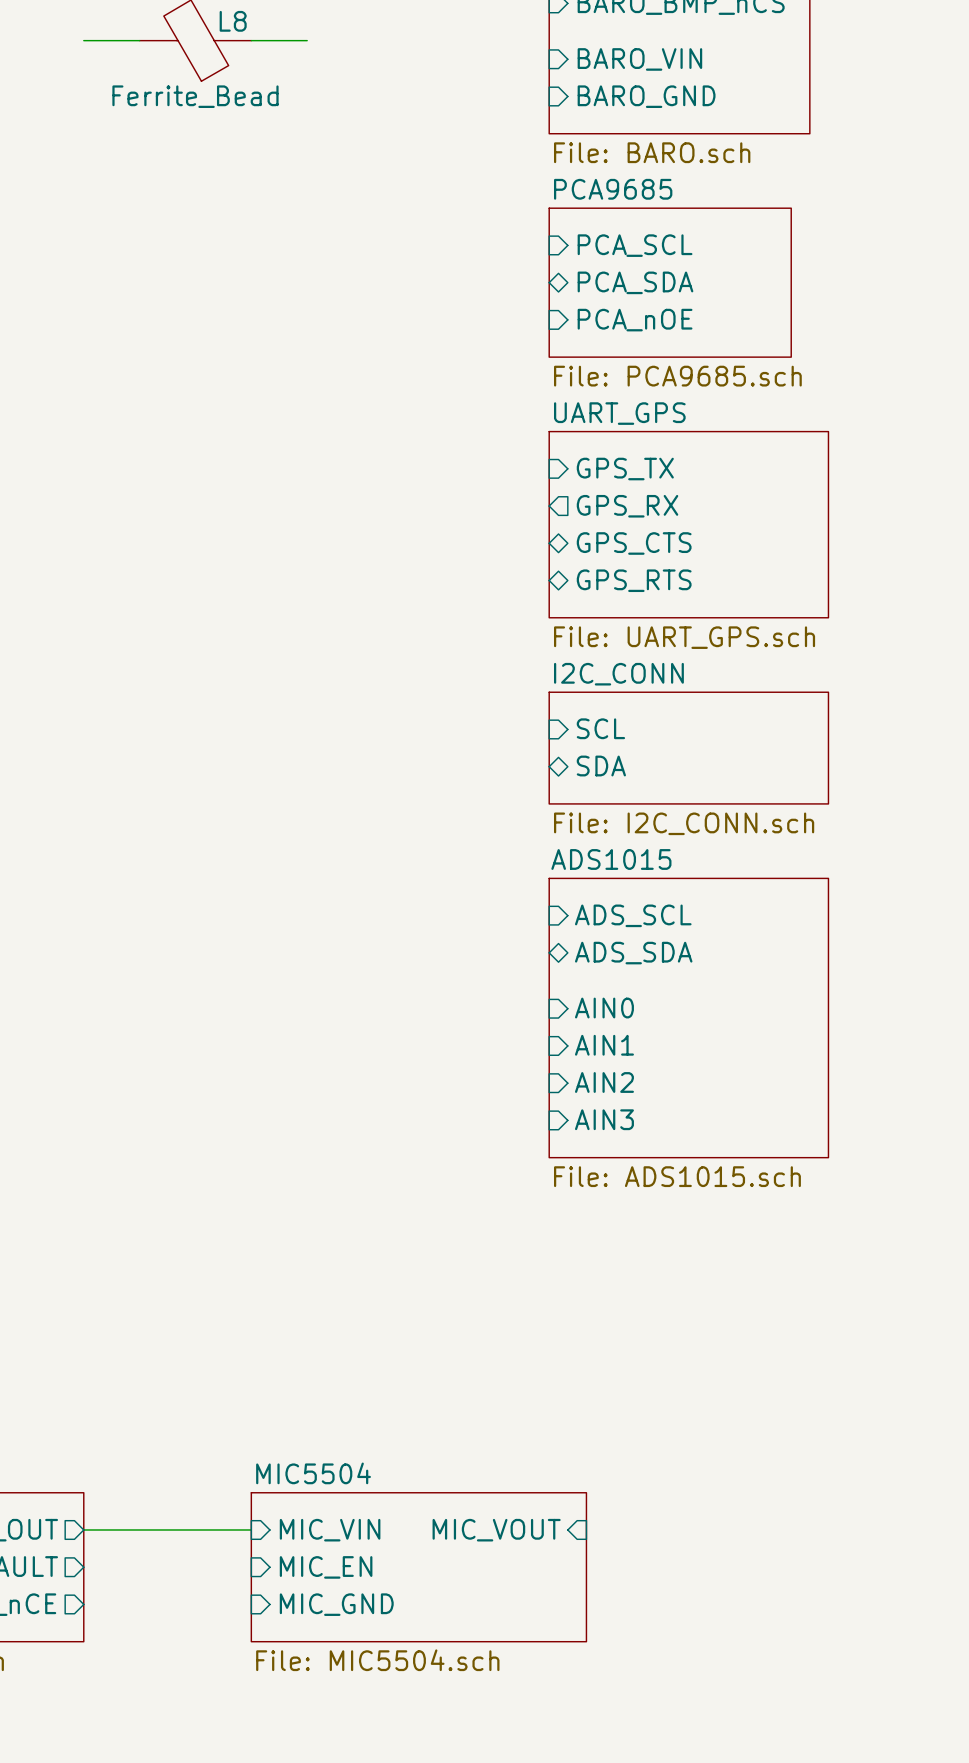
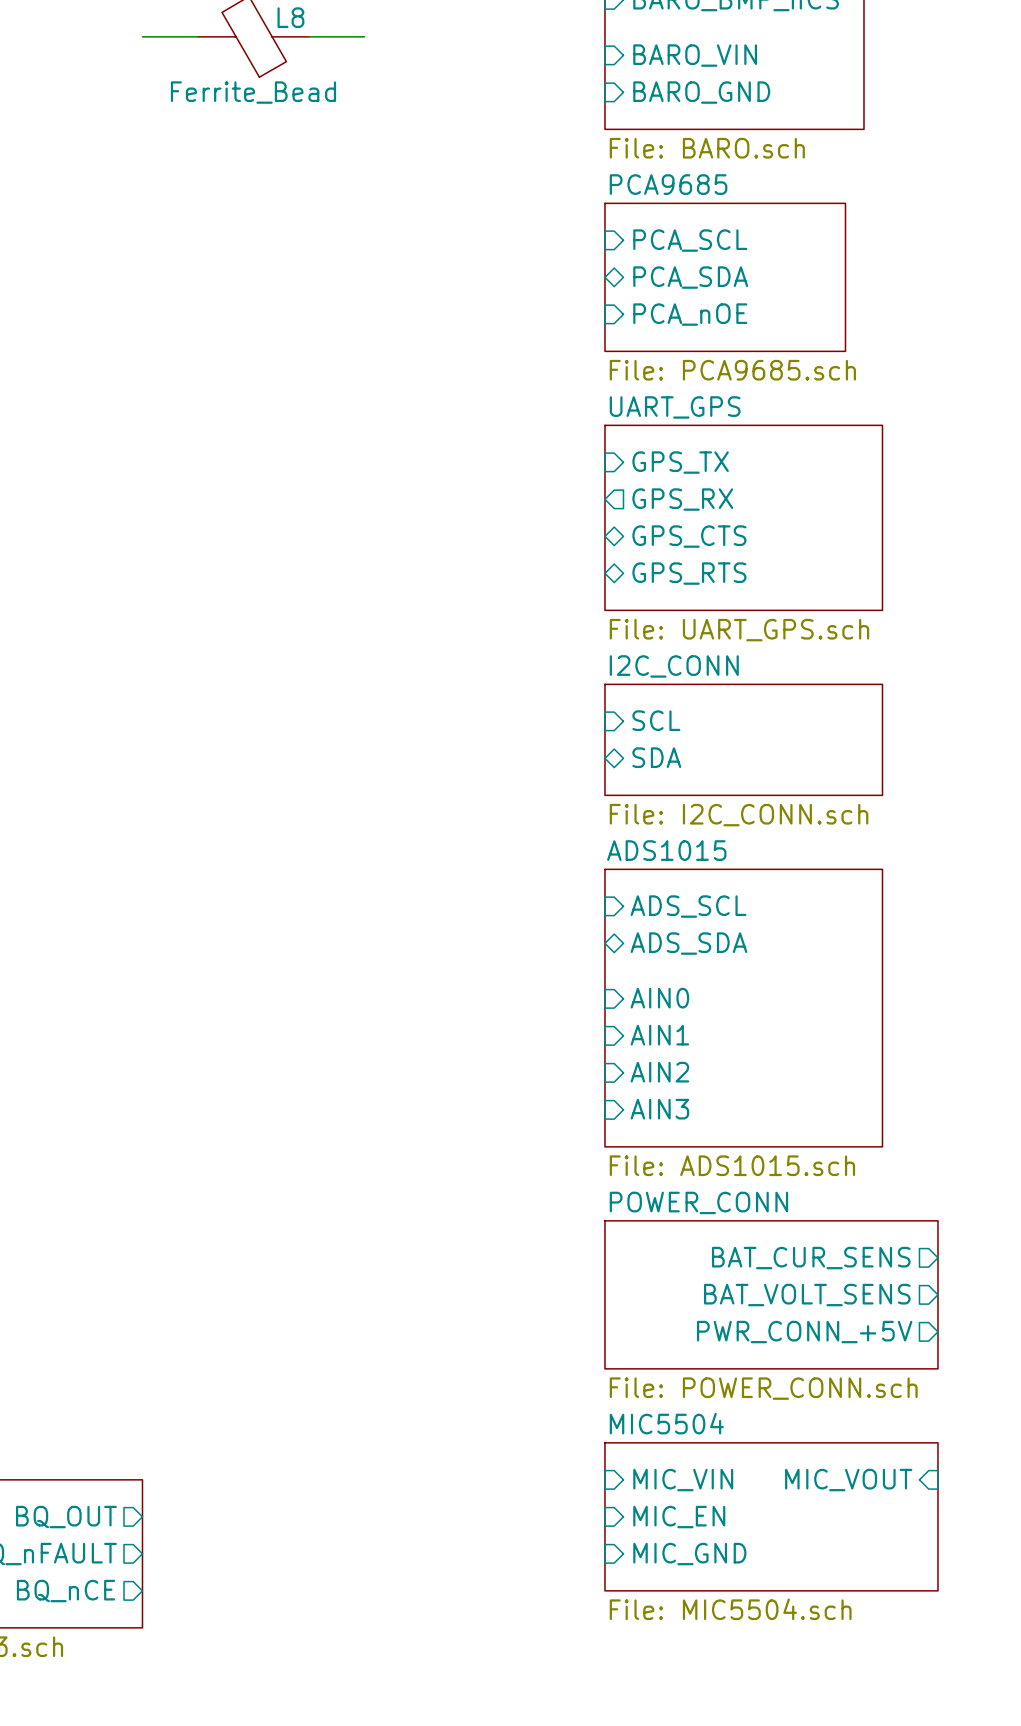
sheet pin: none -> BAT_CUR_SENS (811, 1258)
sheet POWER_CONN: none -> File: POWER_CONN.sch (771, 1294)
sheet pin: none -> BAT_VOLT_SENS (807, 1295)
sheet pin: none -> PWR_CONN_+5V (804, 1332)
wire: (83, 1529) (251, 1529) -> none
sheet pin position: MIC_VIN (330, 1530) -> MIC_VIN (683, 1480)
sheet pin position: MIC_VOUT (496, 1530) -> MIC_VOUT (848, 1480)
sheet pin position: MIC_EN (326, 1567) -> MIC_EN (679, 1517)
sheet MIC5504 position: (418, 1567) -> (771, 1516)
sheet pin position: MIC_GND (336, 1604) -> MIC_GND (689, 1554)

